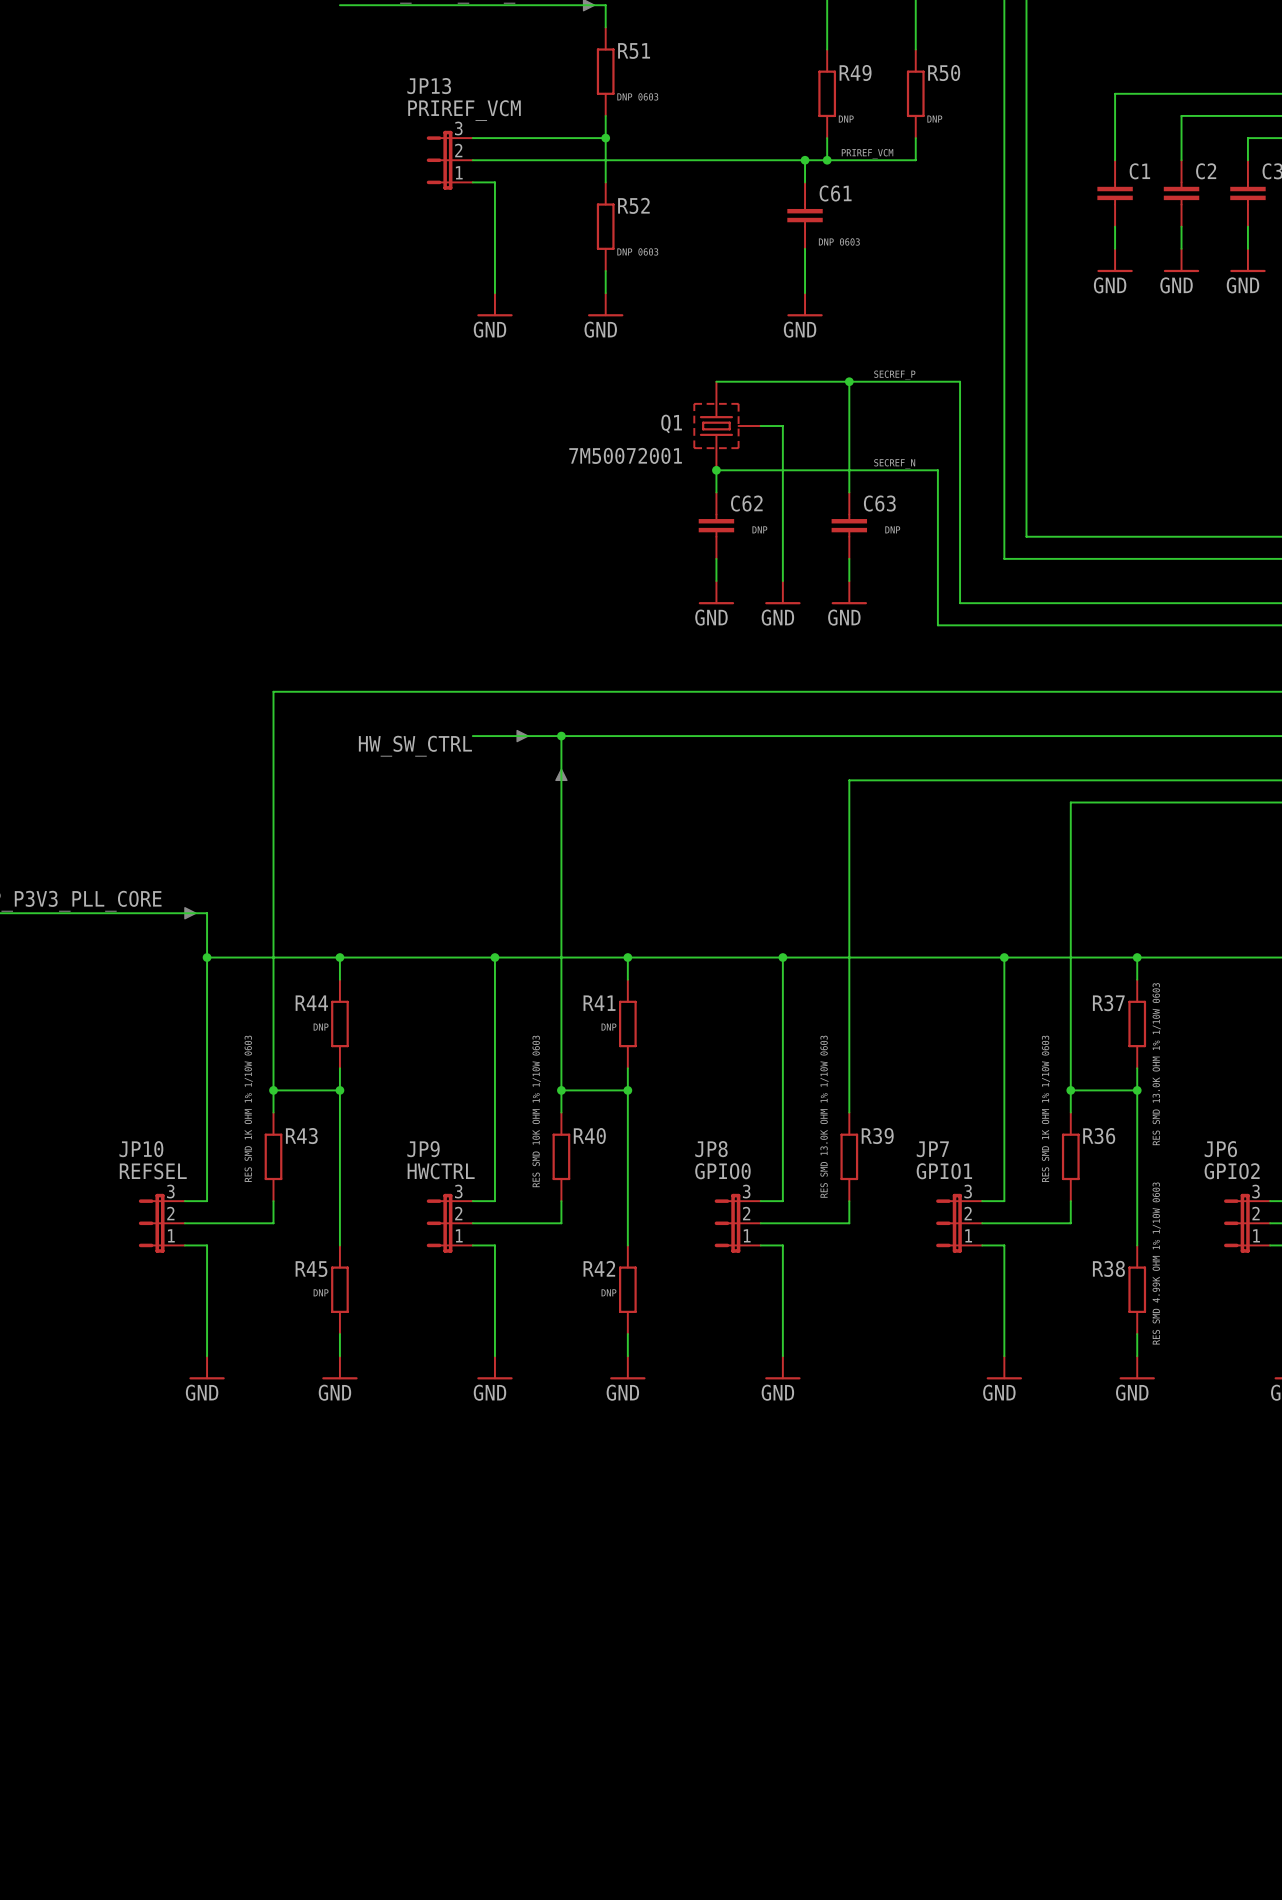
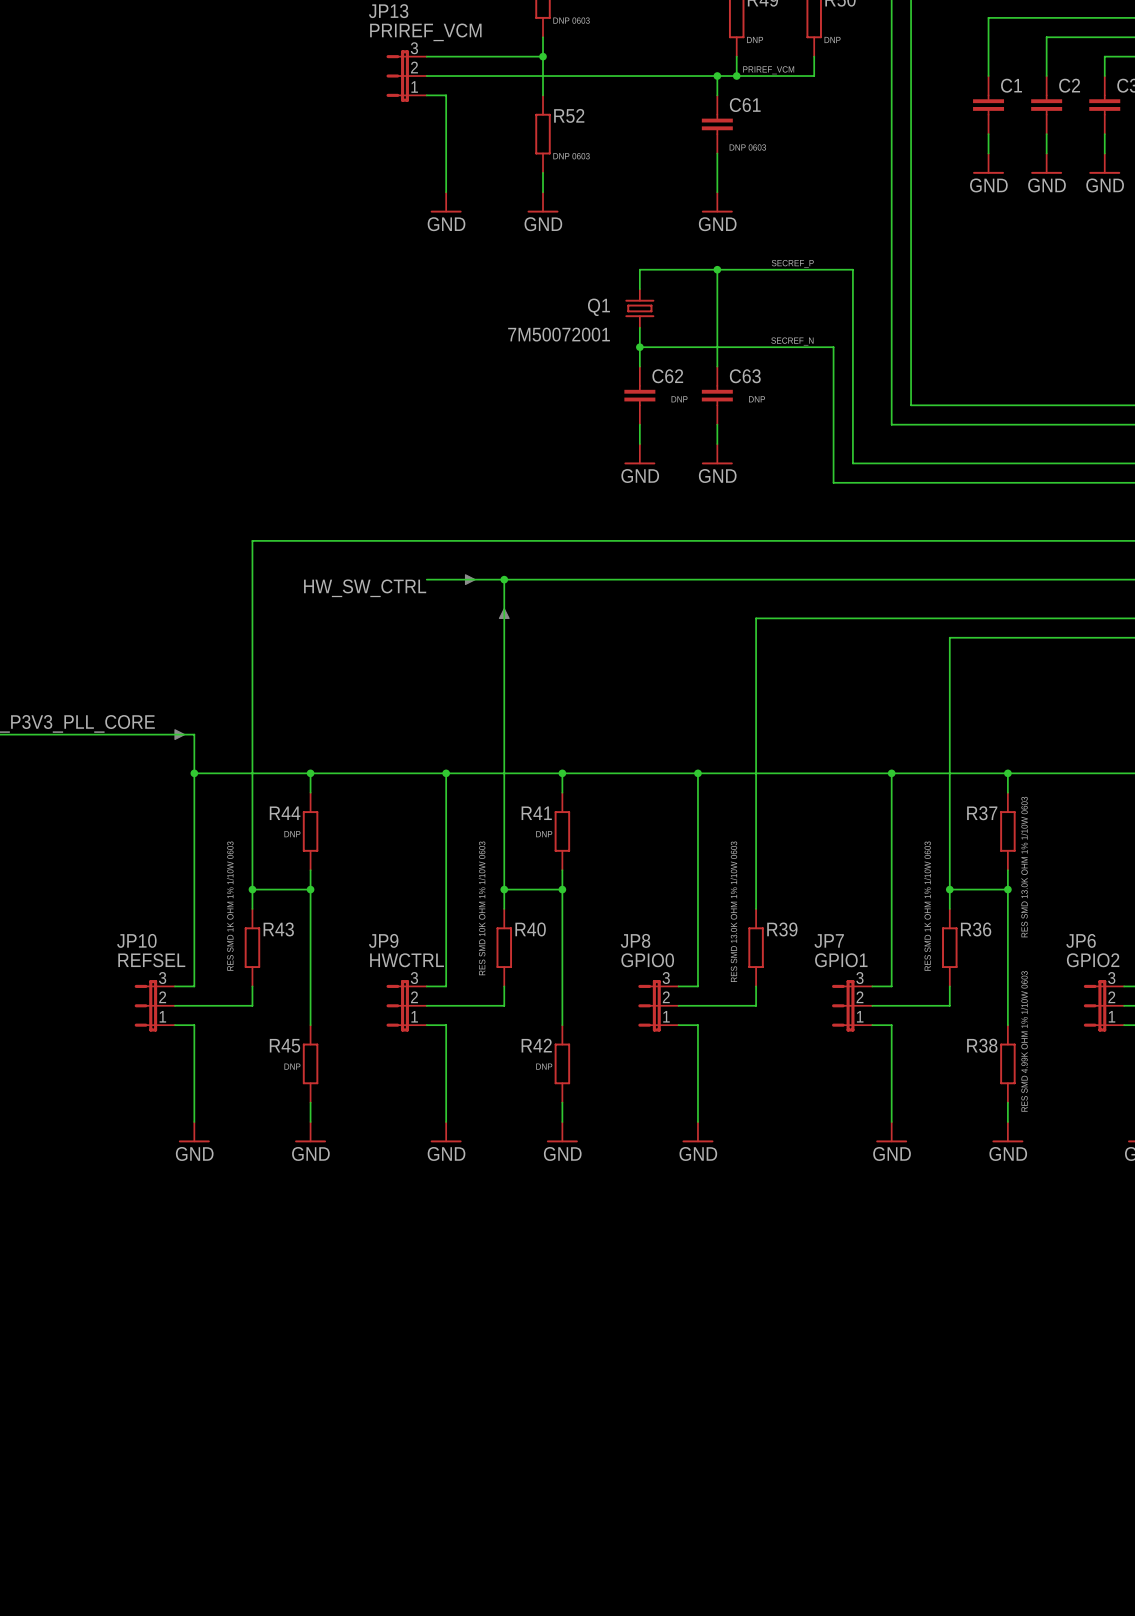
Q1 symbol: [693, 381, 762, 471] -> [625, 288, 655, 329]
wire: (849, 381) (849, 492) -> (717, 269) (717, 366)
junction position: (849, 381) -> (717, 269)
wire: (760, 426) (782, 426) (782, 581) -> none
C63 position: (849, 525) -> (717, 395)
wire: (849, 558) (849, 581) -> (717, 424) (717, 444)
power symbol: GND (782, 592) -> none
power symbol: none -> GND (717, 454)
power symbol: GND (849, 592) -> none

